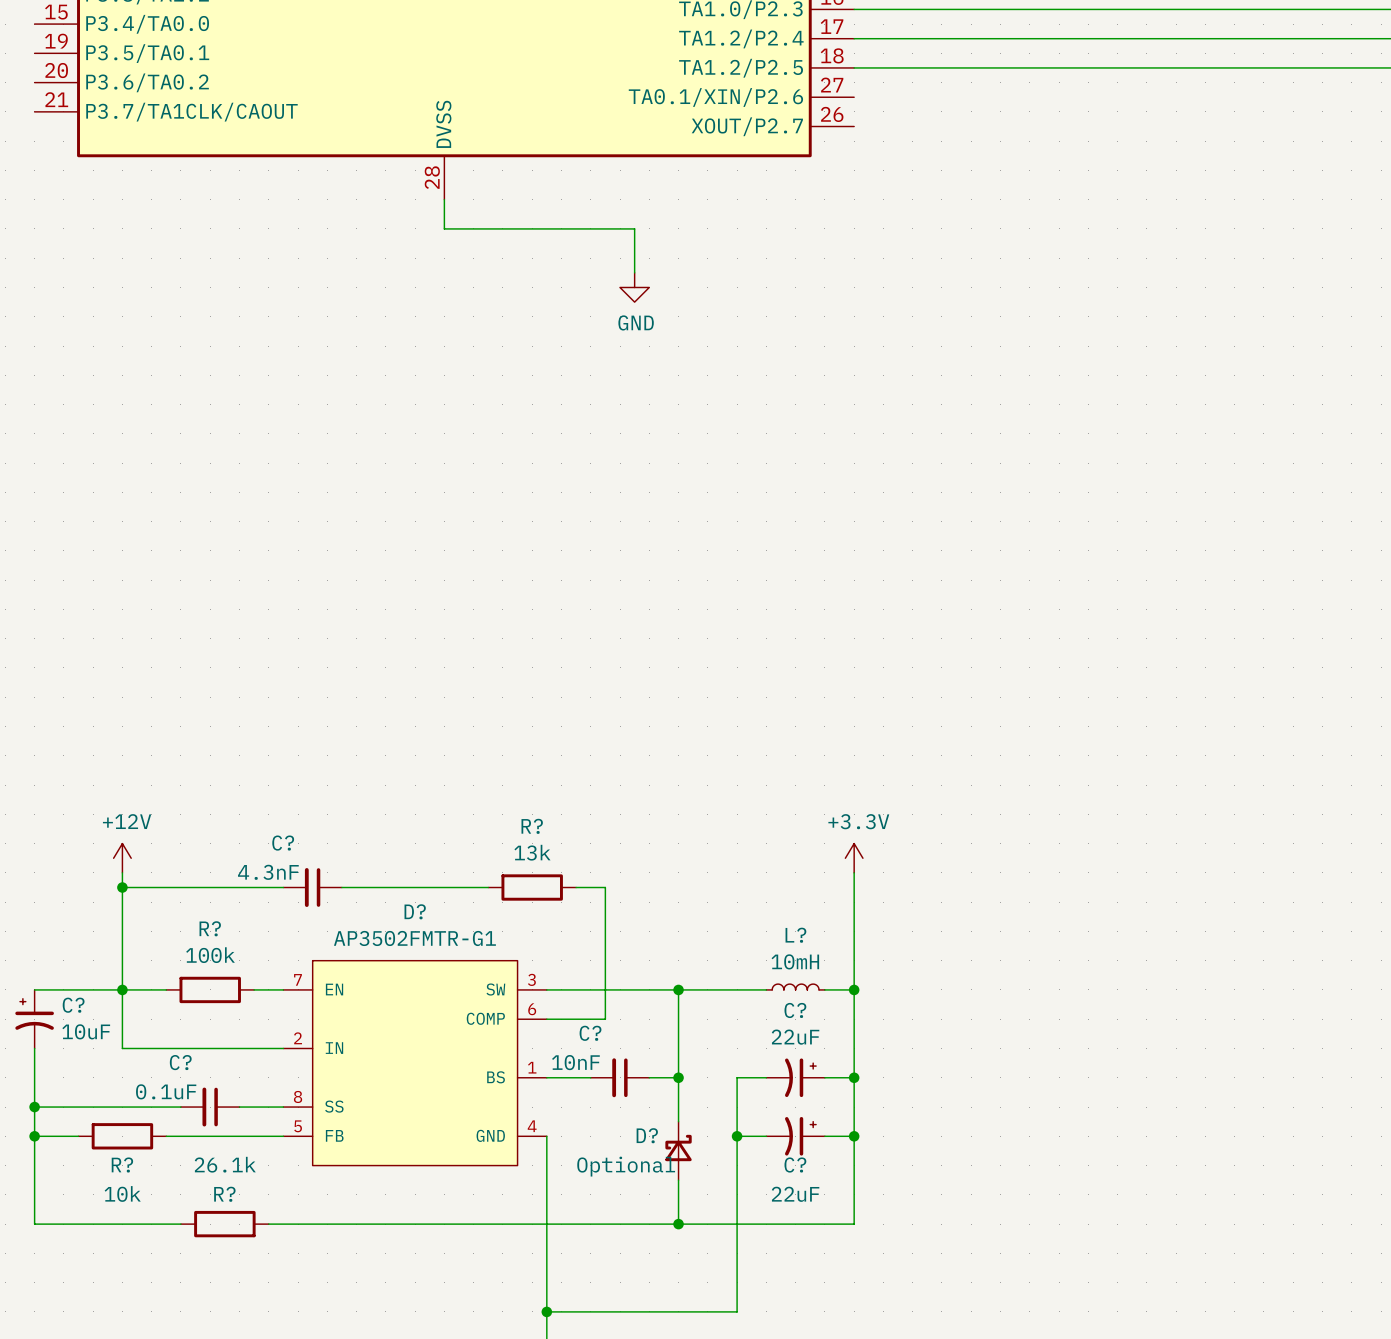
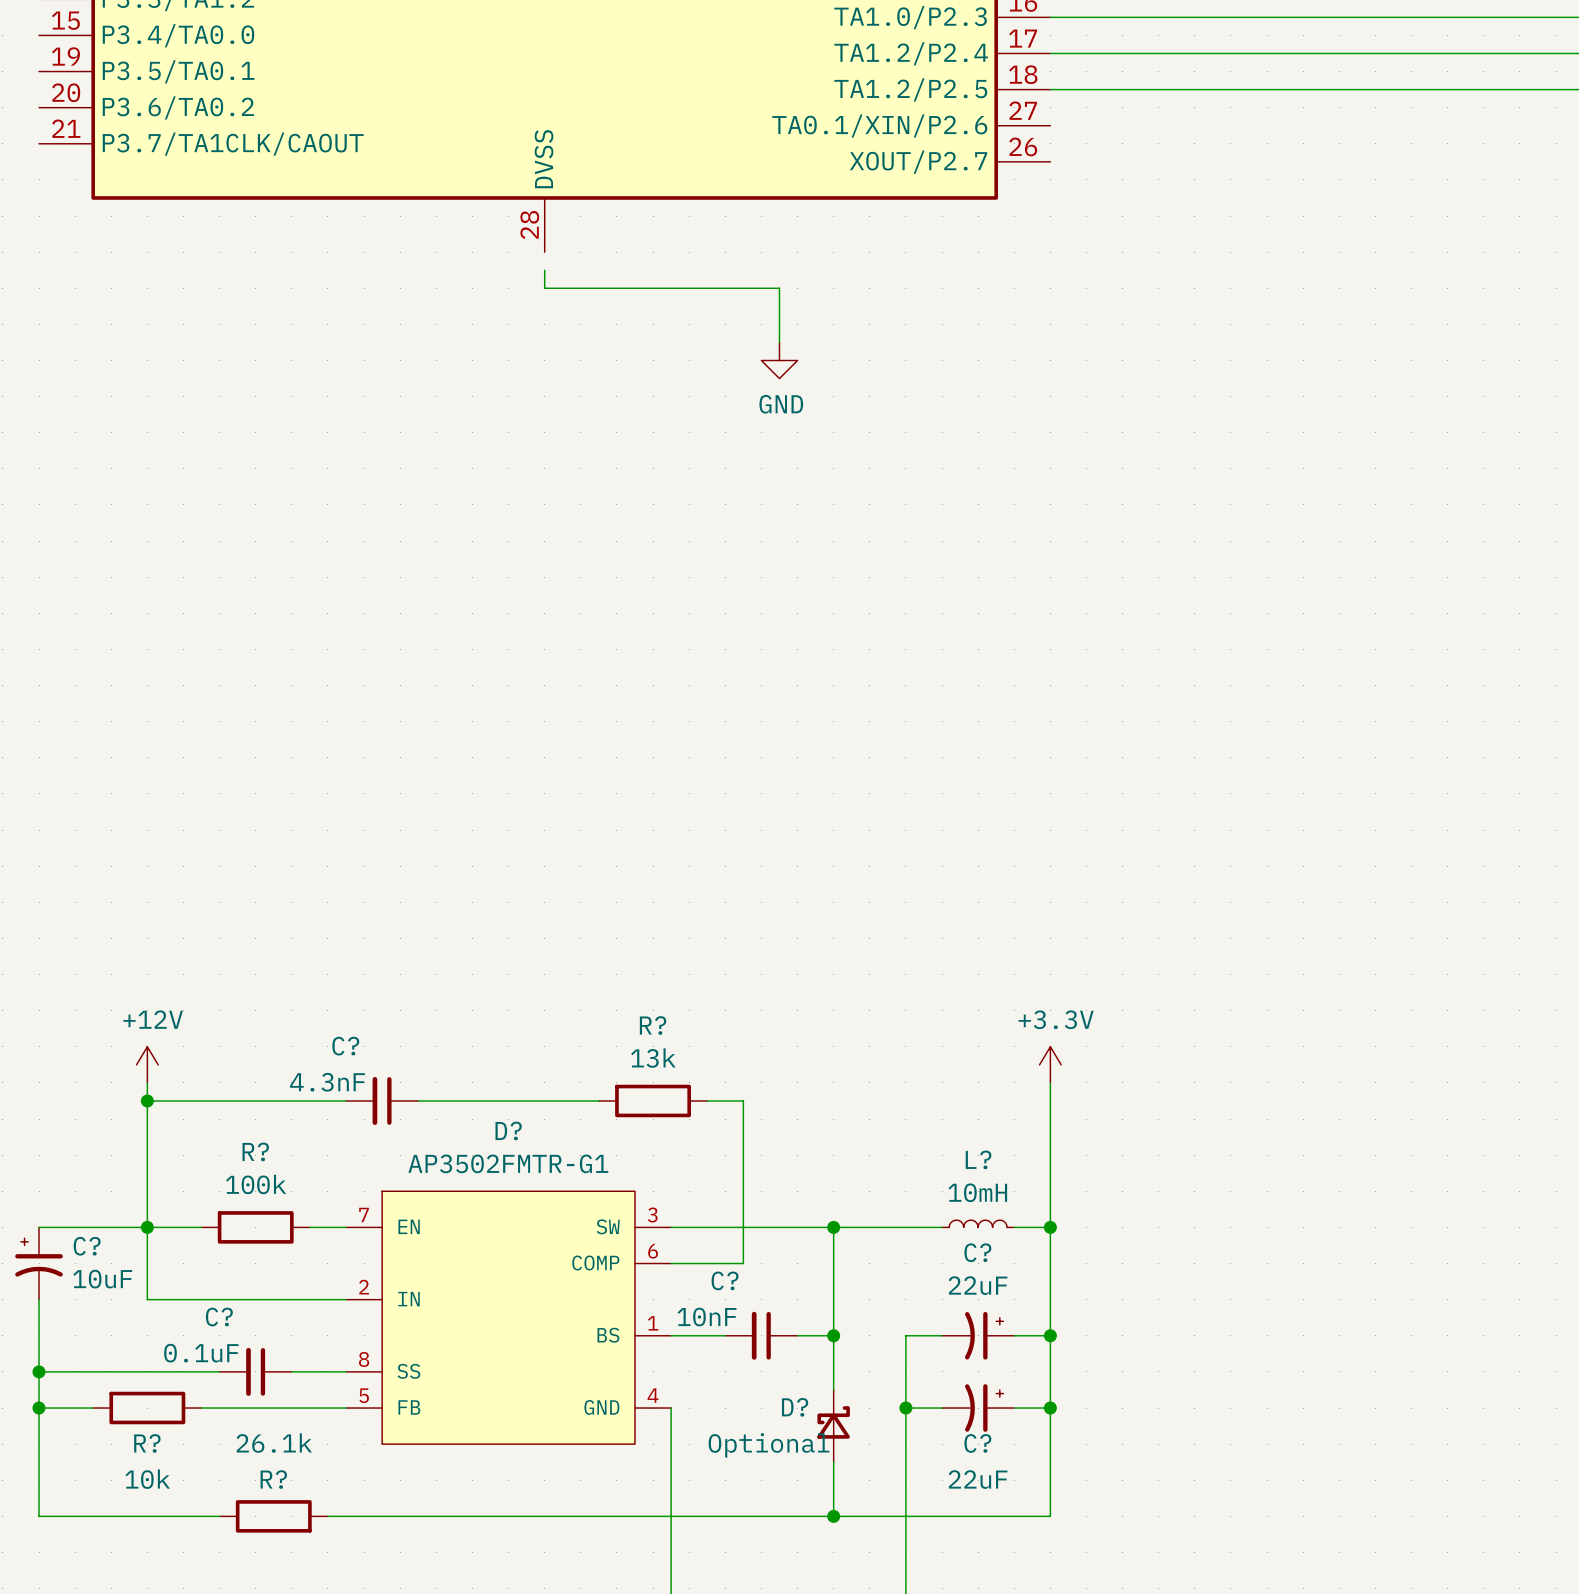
wire: (444, 199) (444, 214) -> none

